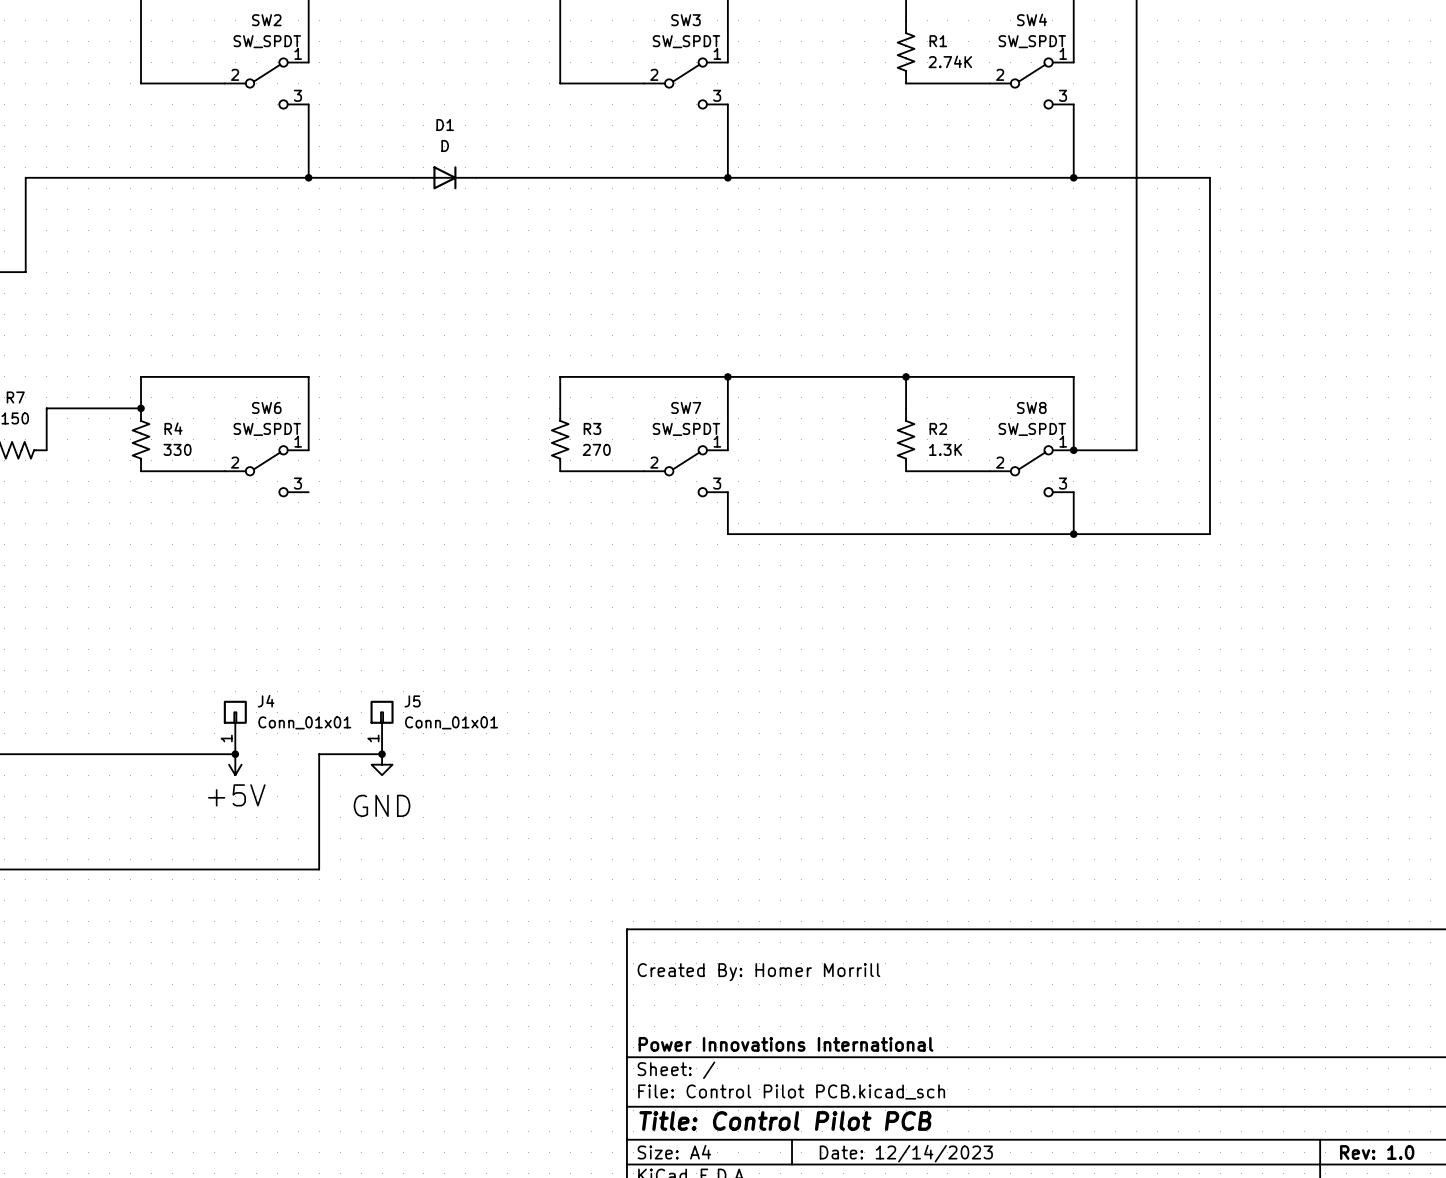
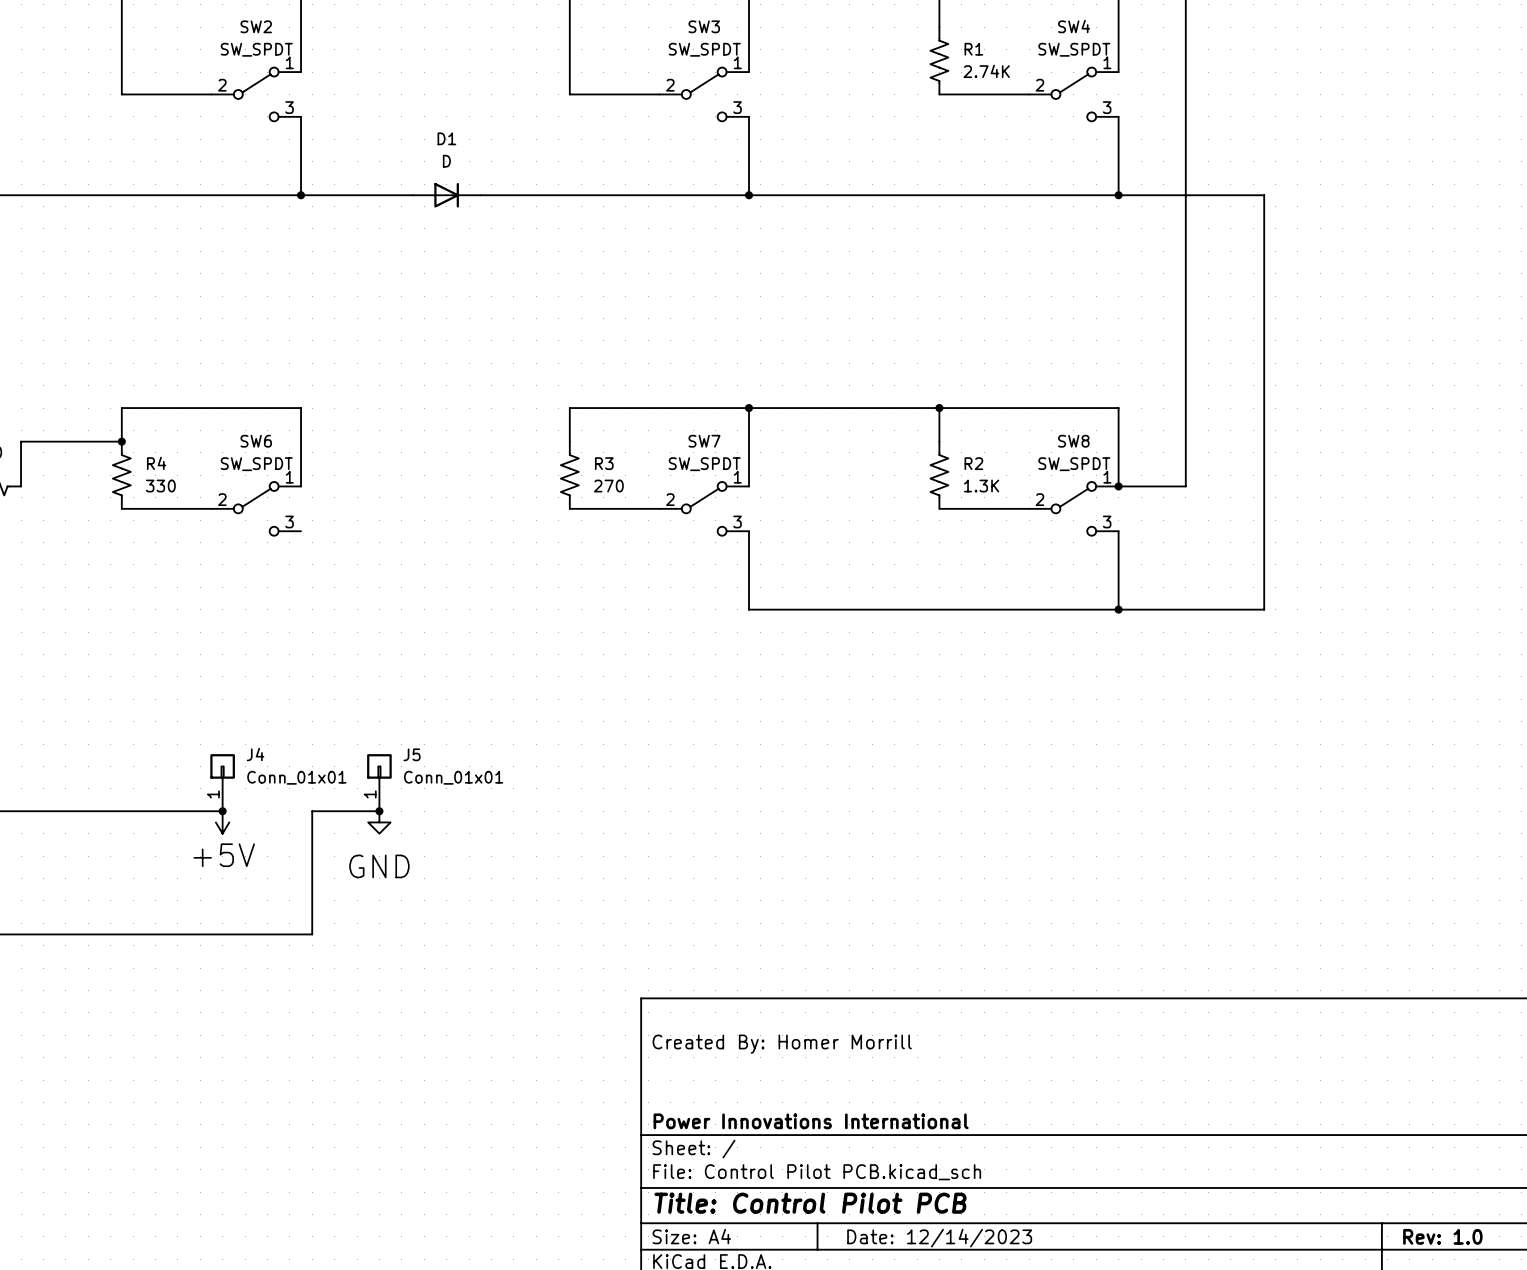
wire: (727, 534) (1209, 534) -> (749, 576) (749, 609) (1264, 609) (1264, 576)
wire: none -> (1118, 576) (1118, 609)
junction position: (1073, 534) -> (1118, 609)

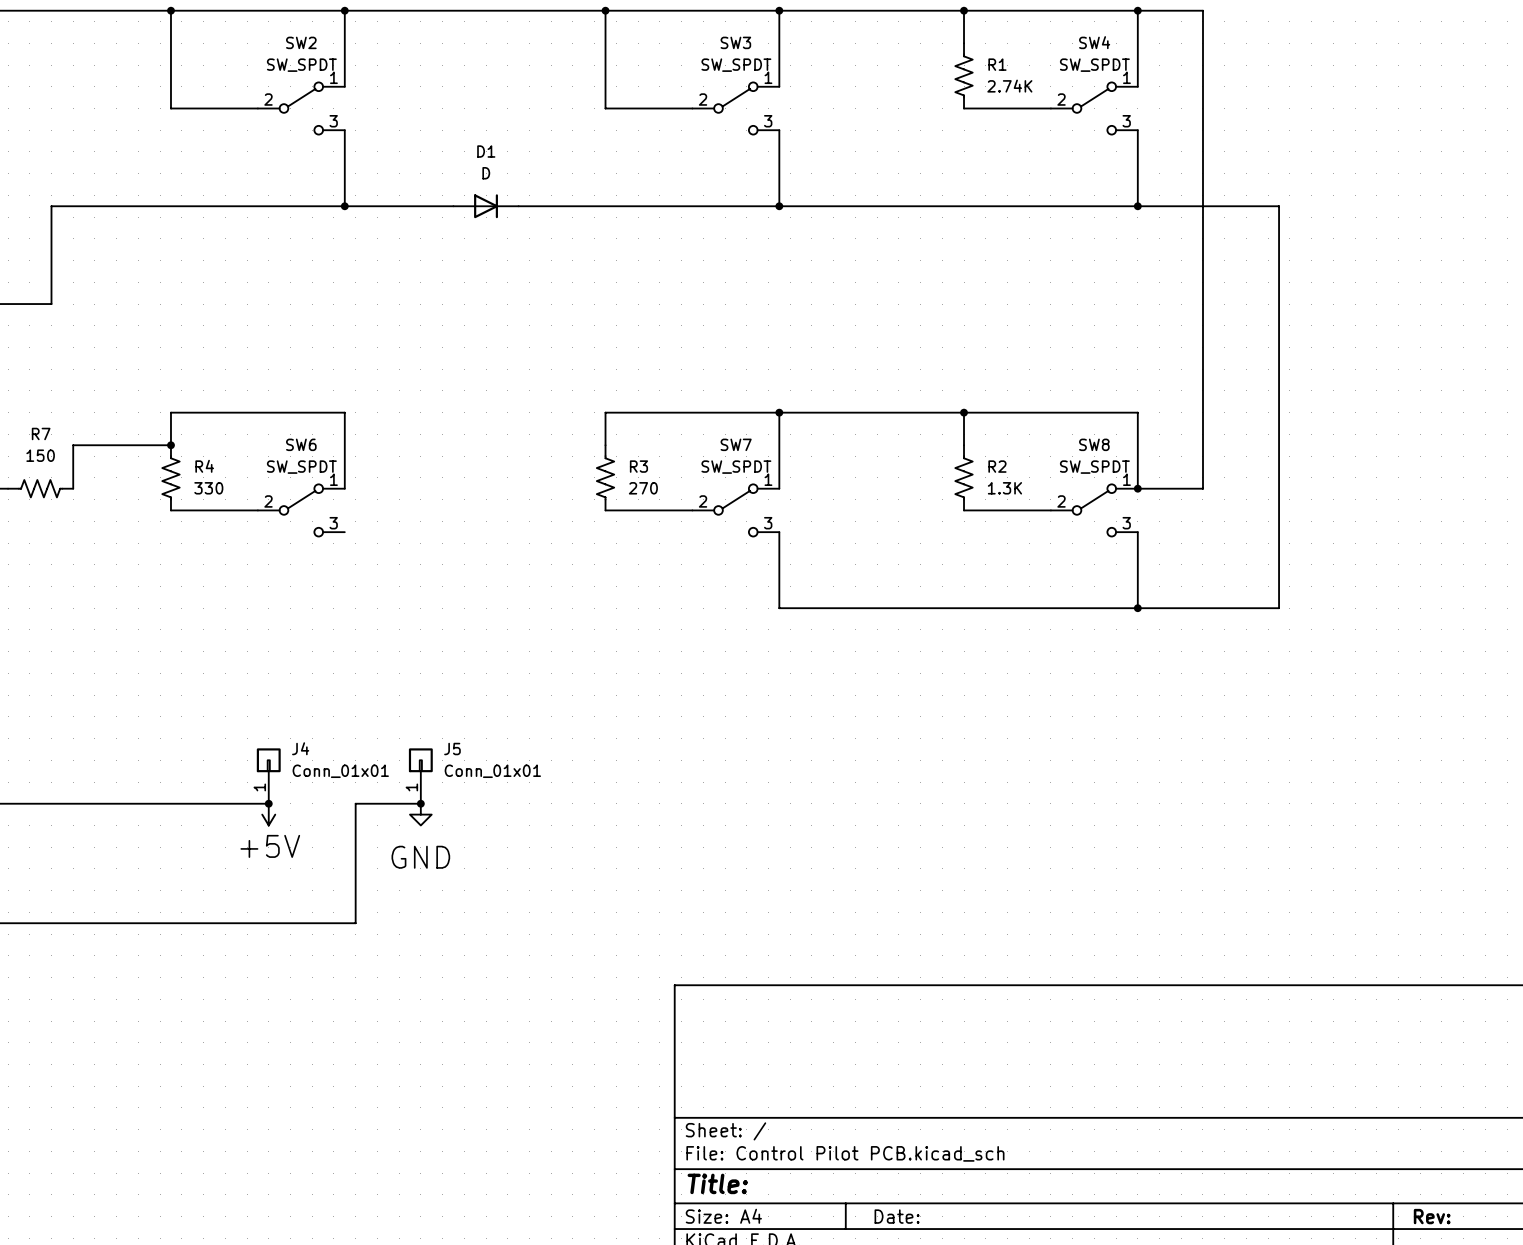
title block: Created By: Homer Morrill (782, 1044) -> none
title block: Power Innovations International (811, 1121) -> none
title block: Title: Control Pilot PCB (810, 1203) -> Title: (717, 1183)
title block: Rev: 1.0 (1442, 1236) -> Rev: (1432, 1216)
title block: Date: 12/14/2023 (939, 1238) -> Date: (897, 1216)

